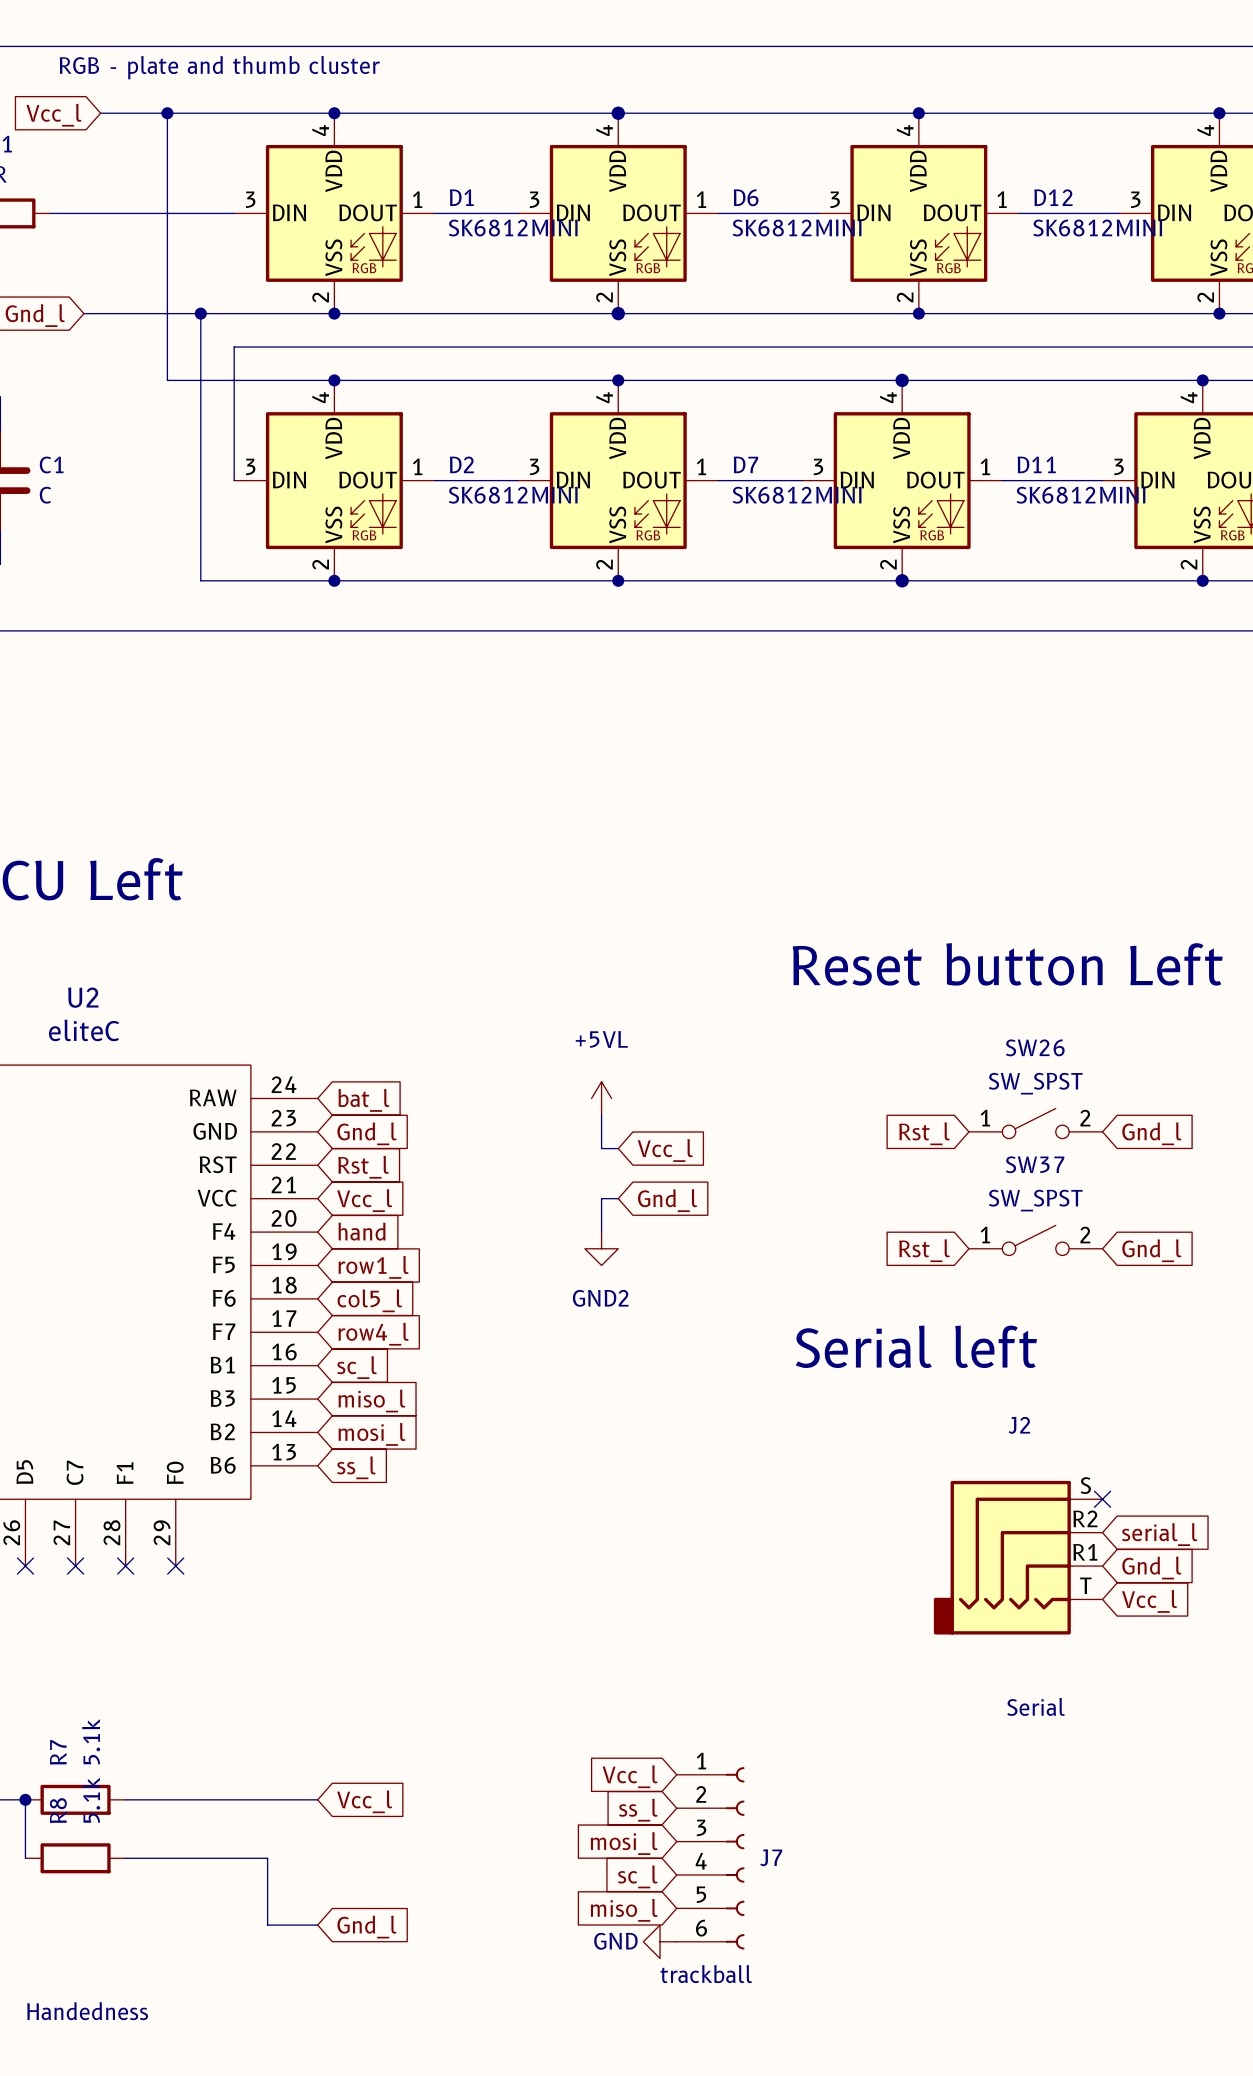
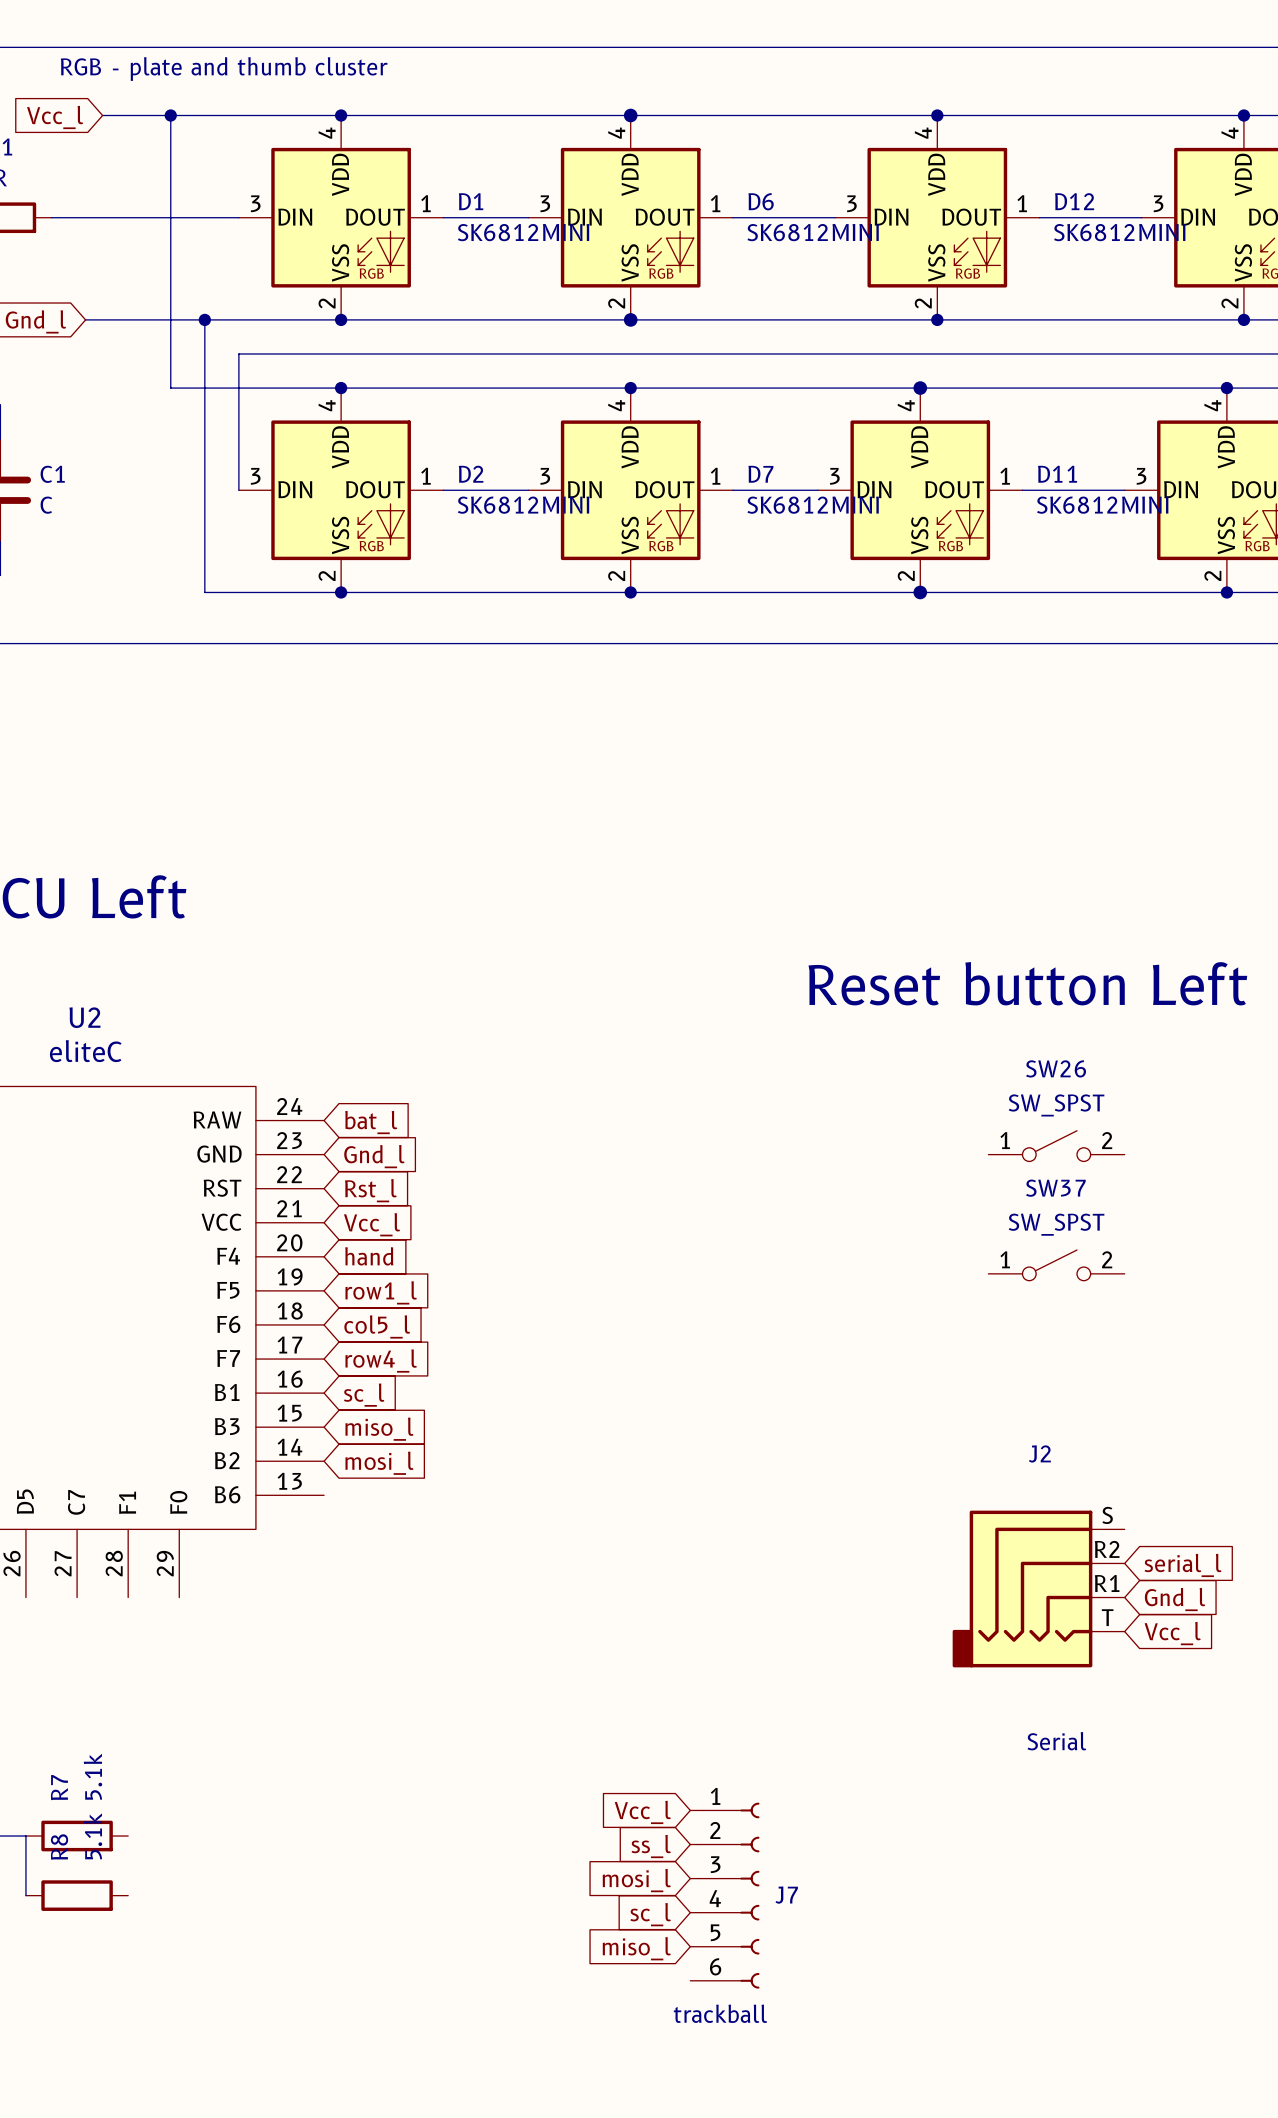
power symbol: +5VL (601, 1098) -> none
wire: (601, 1115) (601, 1148) (618, 1148) -> none
global label: Rst_l (924, 1133) -> none
global label: Gnd_l (1151, 1133) -> none
global label: Vcc_l (665, 1150) -> none
wire: (618, 1198) (601, 1198) (601, 1232) -> none
global label: Gnd_l (667, 1200) -> none
power symbol: GND2 (601, 1248) -> none
global label: Rst_l (924, 1250) -> none
global label: Gnd_l (1151, 1250) -> none
text: Serial left (916, 1346) -> none
global label: ss_l (356, 1467) -> none
no-connect mark: (1102, 1499) -> none
no-connect mark: (25, 1566) -> none
no-connect mark: (75, 1566) -> none
no-connect mark: (125, 1566) -> none
no-connect mark: (175, 1566) -> none
junction: (25, 1799) -> none
wire: (125, 1799) (317, 1799) -> none
global label: Vcc_l (364, 1801) -> none
wire: (125, 1858) (267, 1858) (267, 1925) (317, 1925) -> none
global label: Gnd_l (367, 1927) -> none
power symbol: GND (660, 1941) -> none
text: Handedness (87, 2011) -> none

